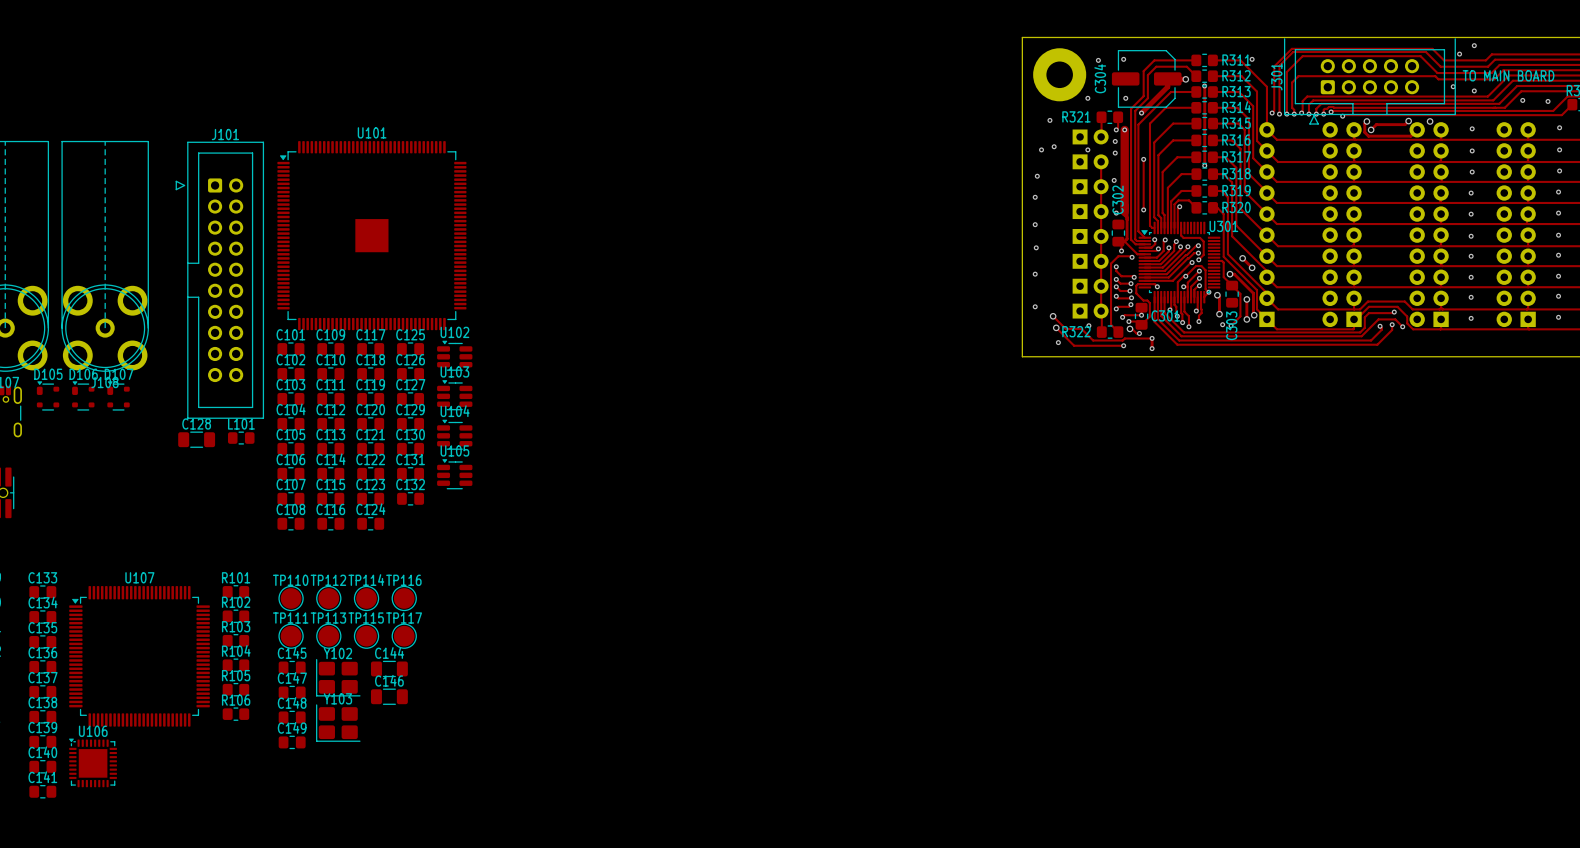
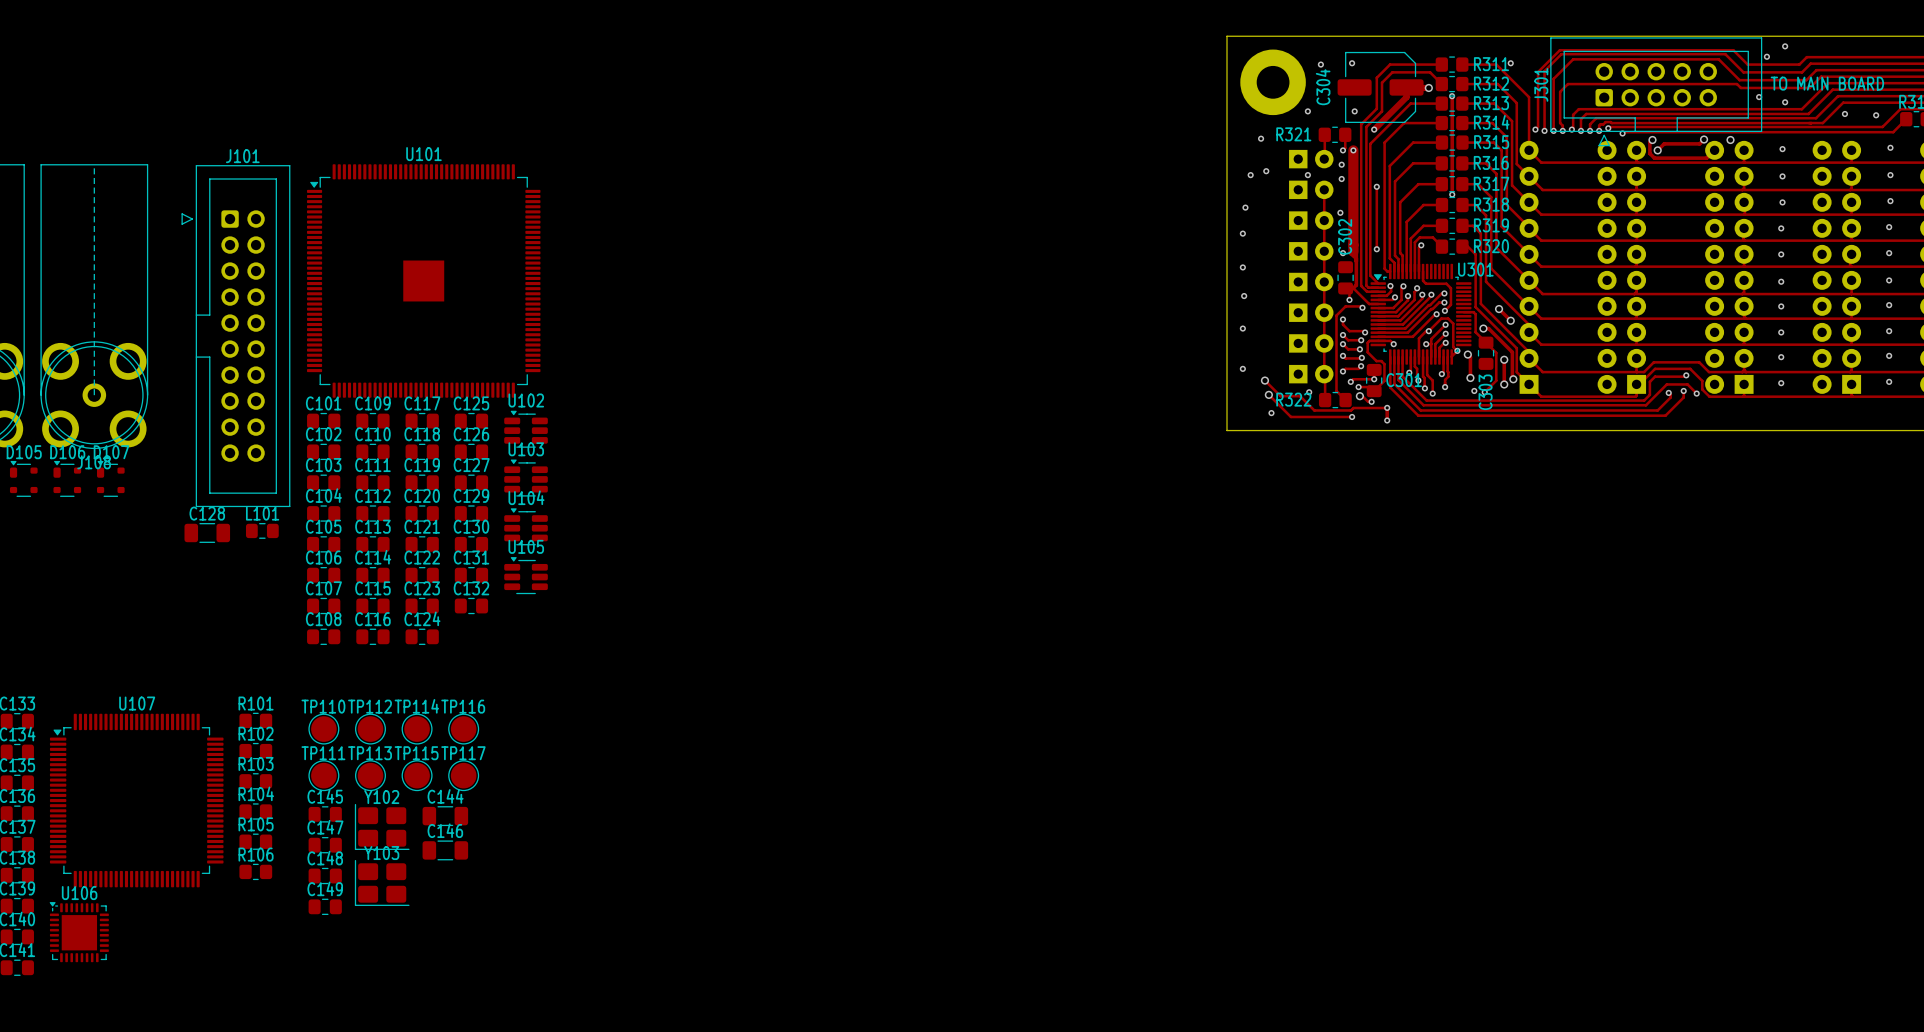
J301 footprint: [1284, 38, 1456, 125] -> [1550, 37, 1763, 147]

